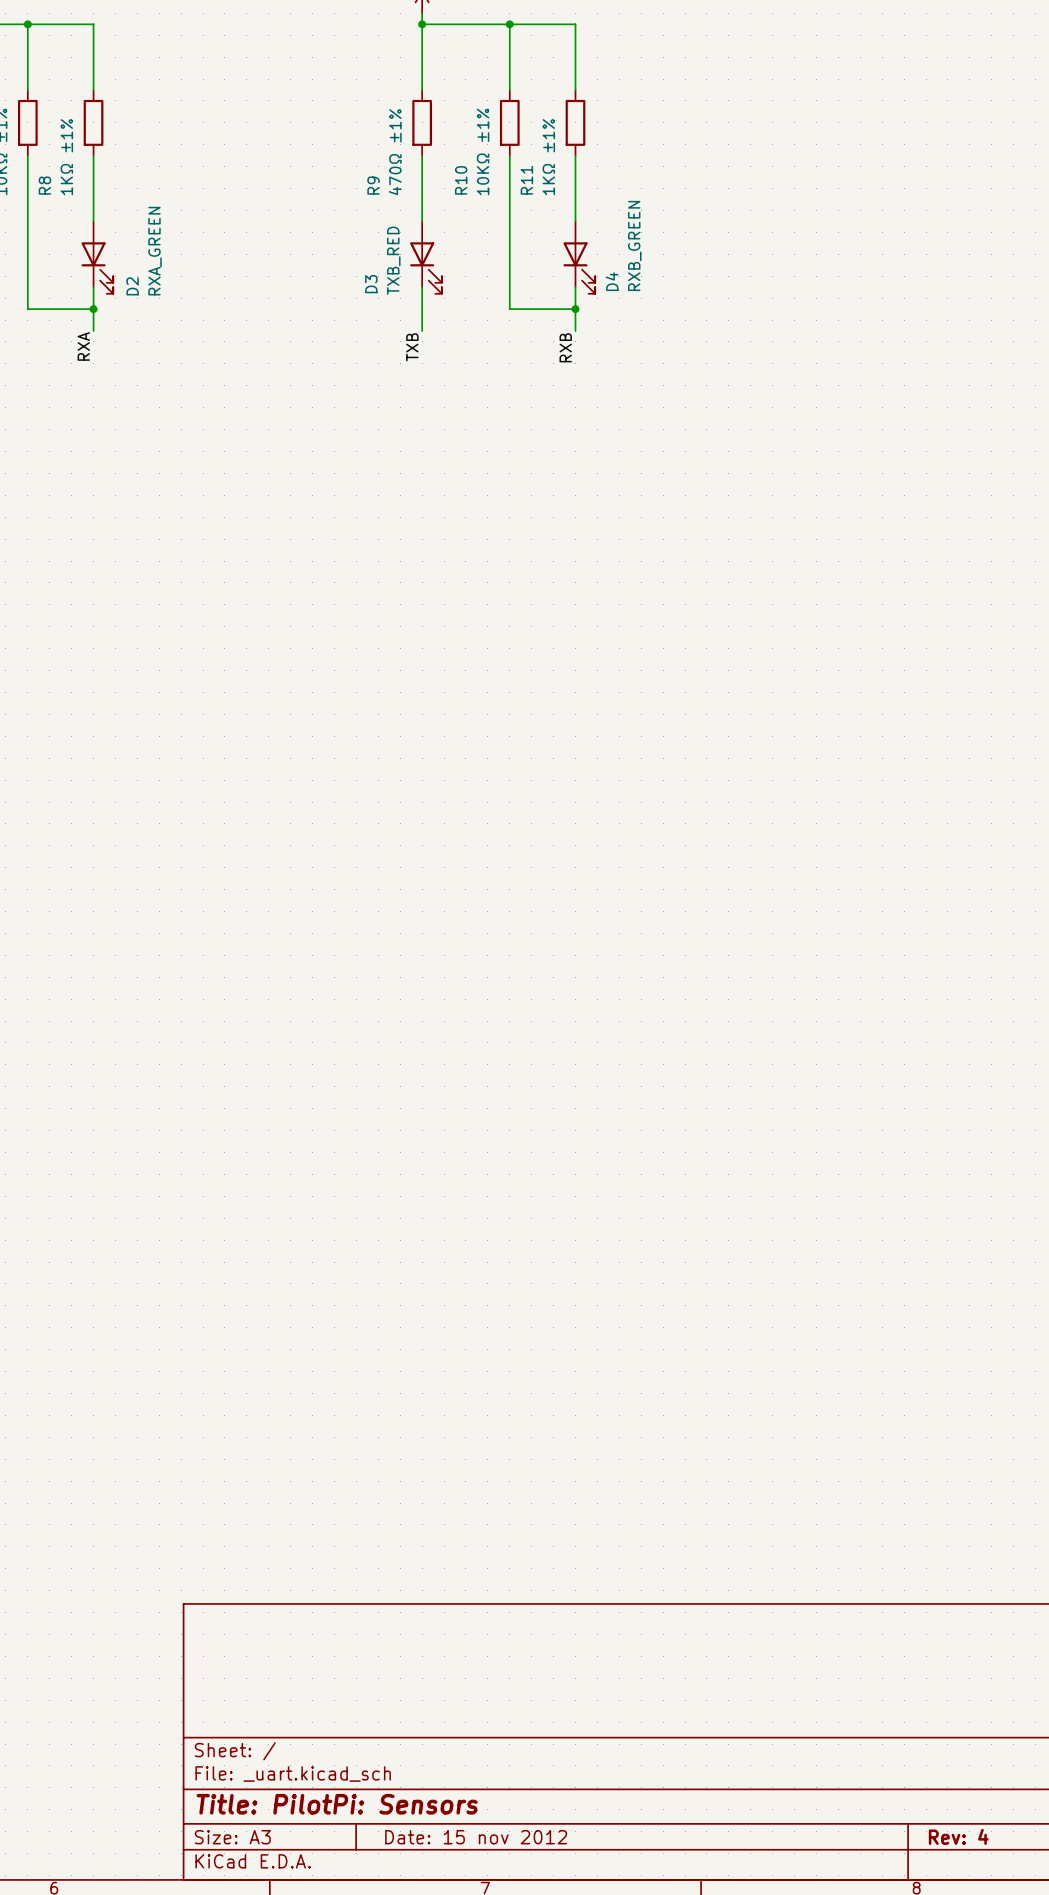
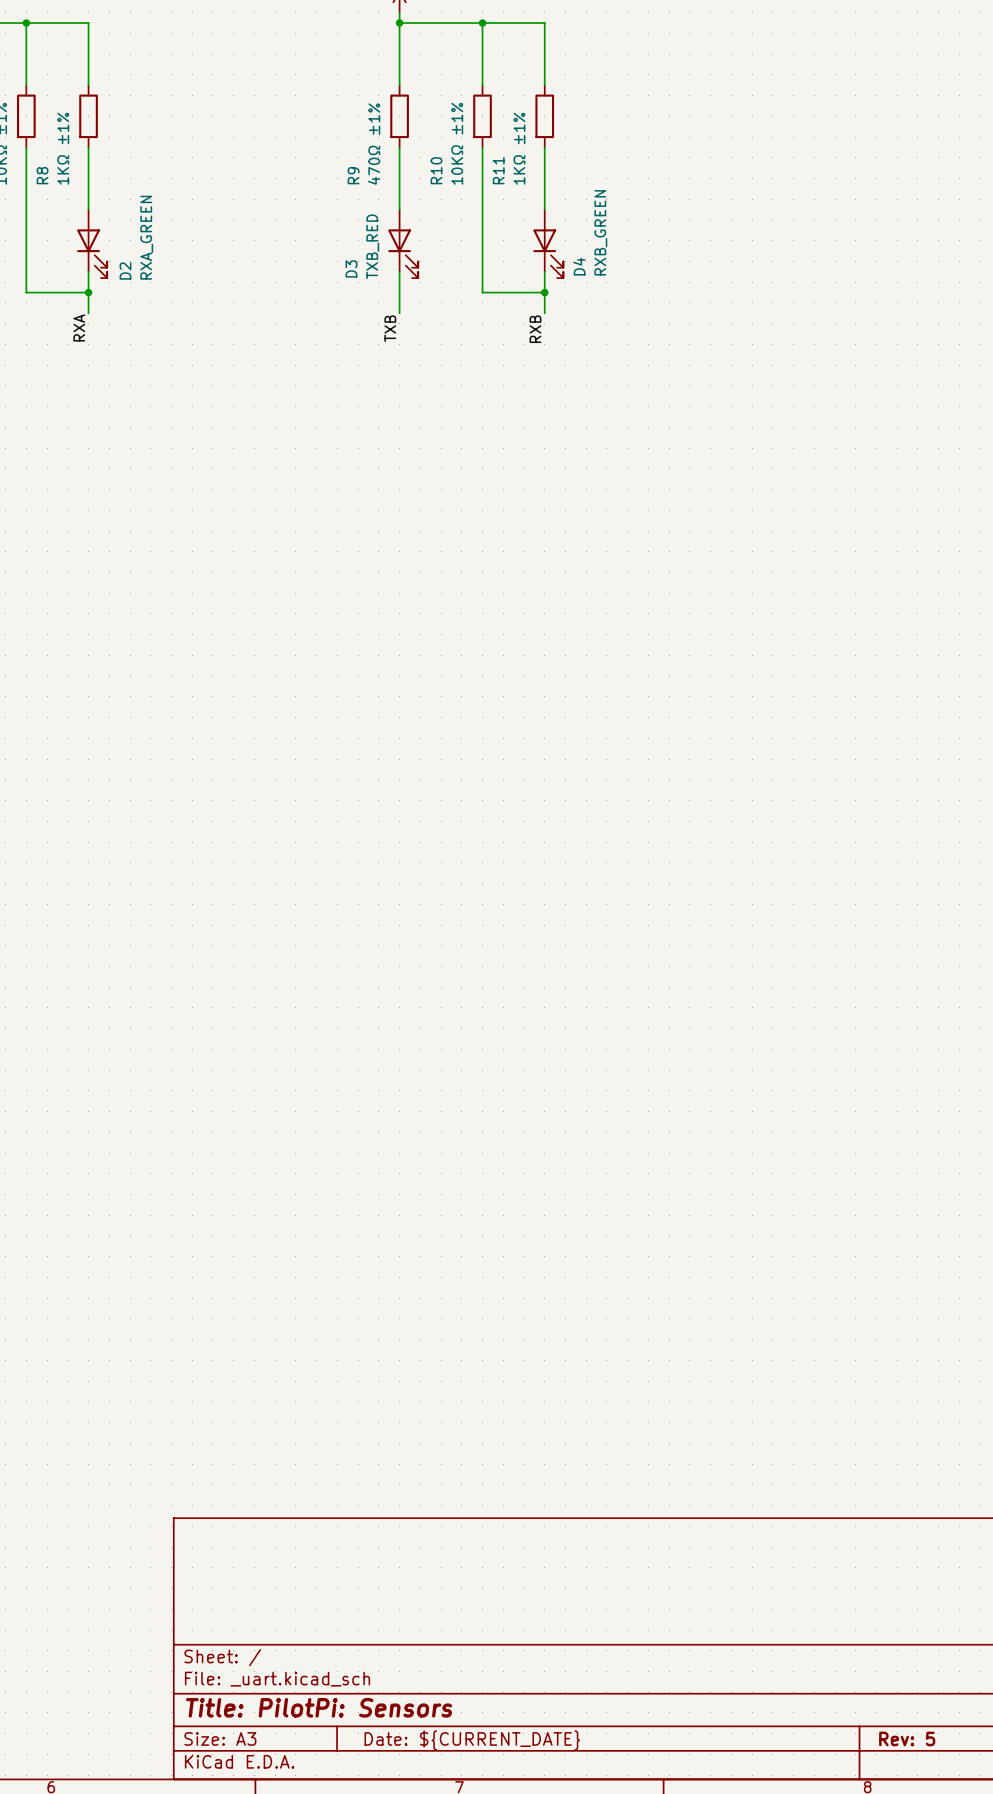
title block: Rev: 4 (958, 1836) -> Rev: 5 (907, 1738)
title block: Date: 15 nov 2012 (476, 1837) -> Date: ${CURRENT_DATE} (472, 1740)

